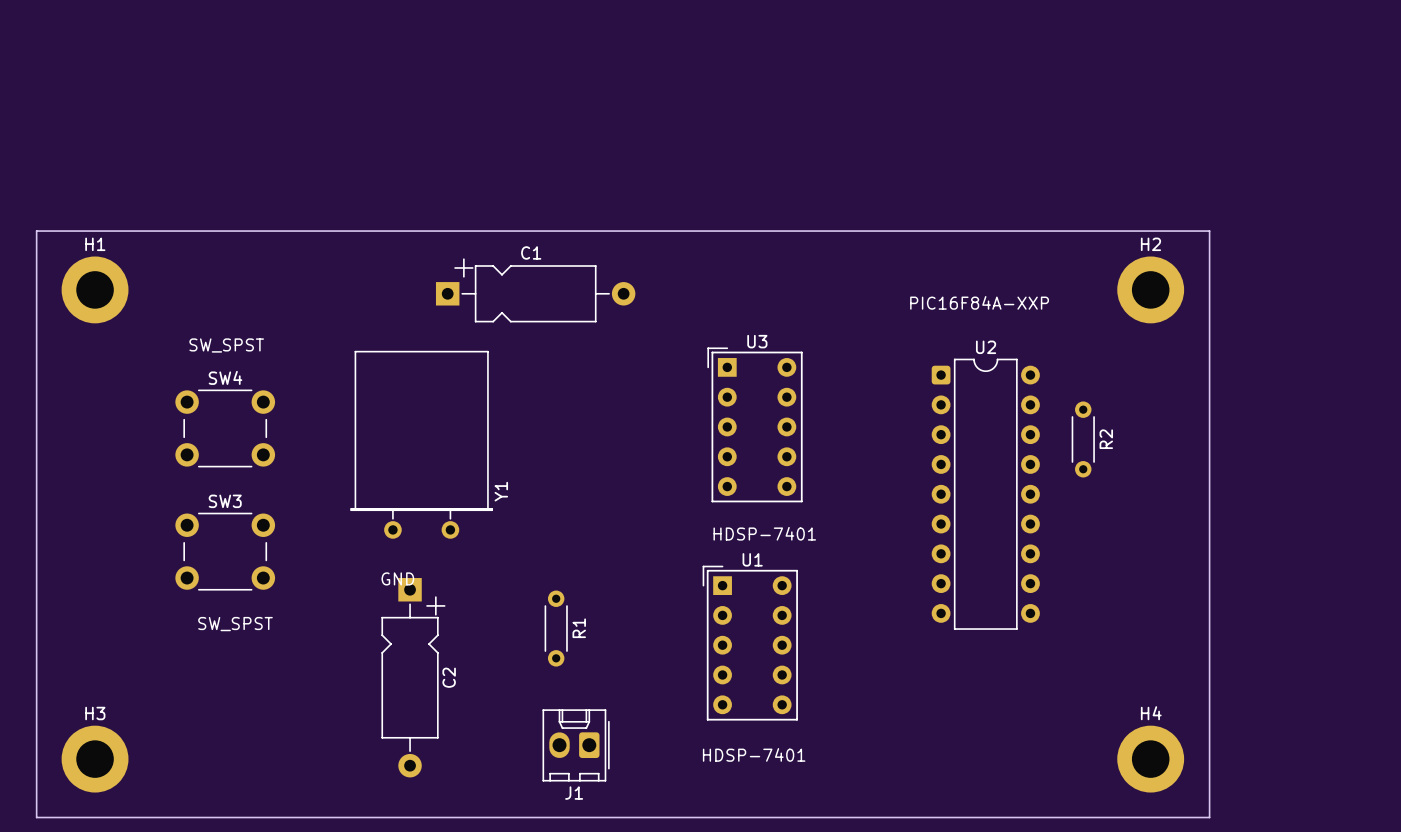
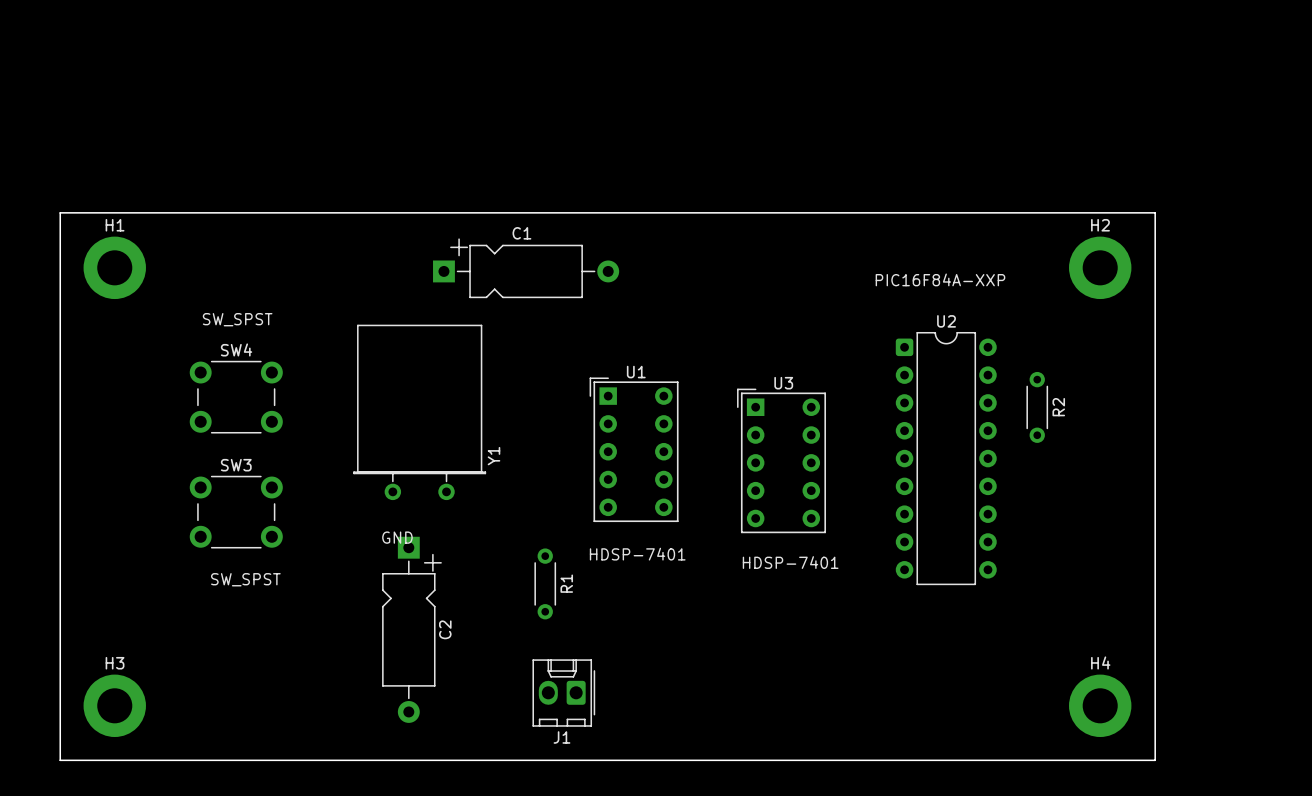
U3 position: (755, 424) -> (781, 460)
text: HDSP-7401 (764, 533) -> none
text: none -> HDSP-7401 (637, 554)
text: none -> HDSP-7401 (790, 562)
U1 position: (750, 643) -> (634, 449)
text: HDSP-7401 (754, 754) -> none

